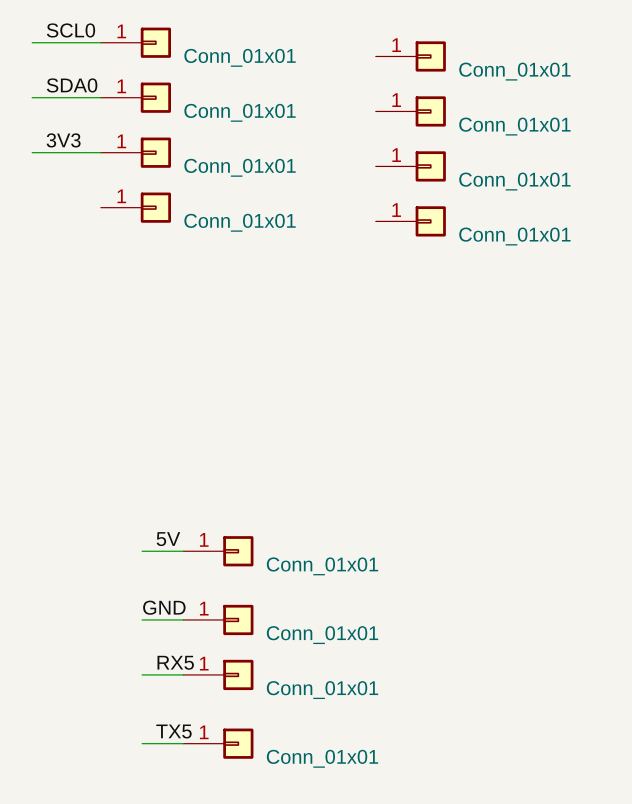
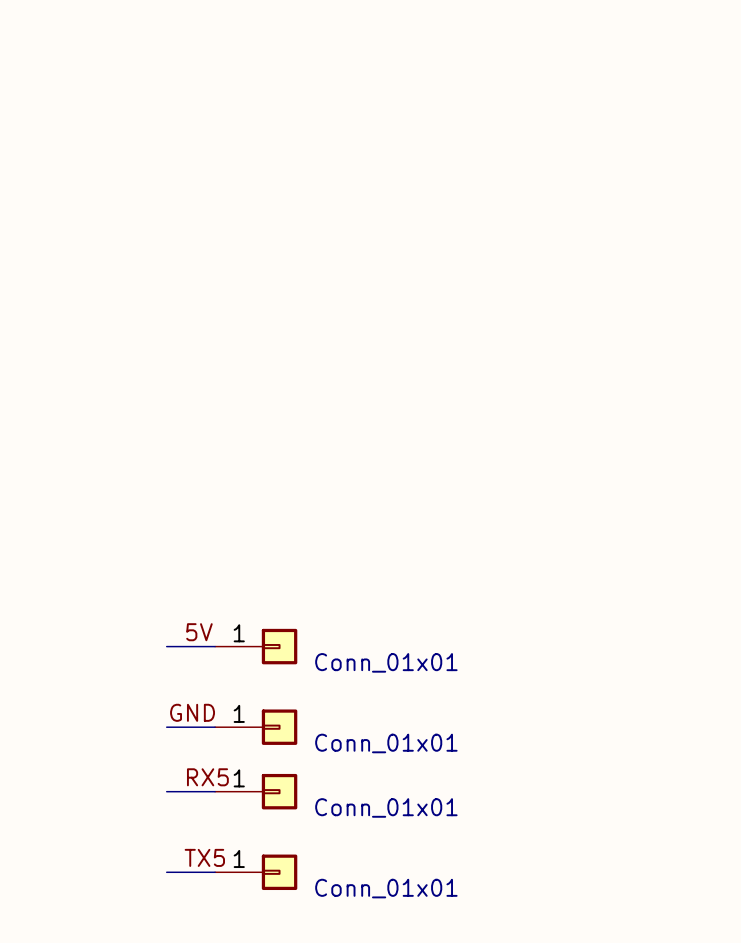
label: SCL0 (70, 30) -> none
wire: (32, 42) (100, 42) -> none
part: Conn_01x01 (135, 42) -> none
part: Conn_01x01 (410, 56) -> none
label: SDA0 (72, 85) -> none
wire: (32, 97) (100, 97) -> none
part: Conn_01x01 (135, 97) -> none
part: Conn_01x01 (410, 111) -> none
label: 3V3 (63, 140) -> none
wire: (32, 152) (100, 152) -> none
part: Conn_01x01 (135, 152) -> none
part: Conn_01x01 (410, 166) -> none
part: Conn_01x01 (135, 207) -> none
part: Conn_01x01 (410, 221) -> none

